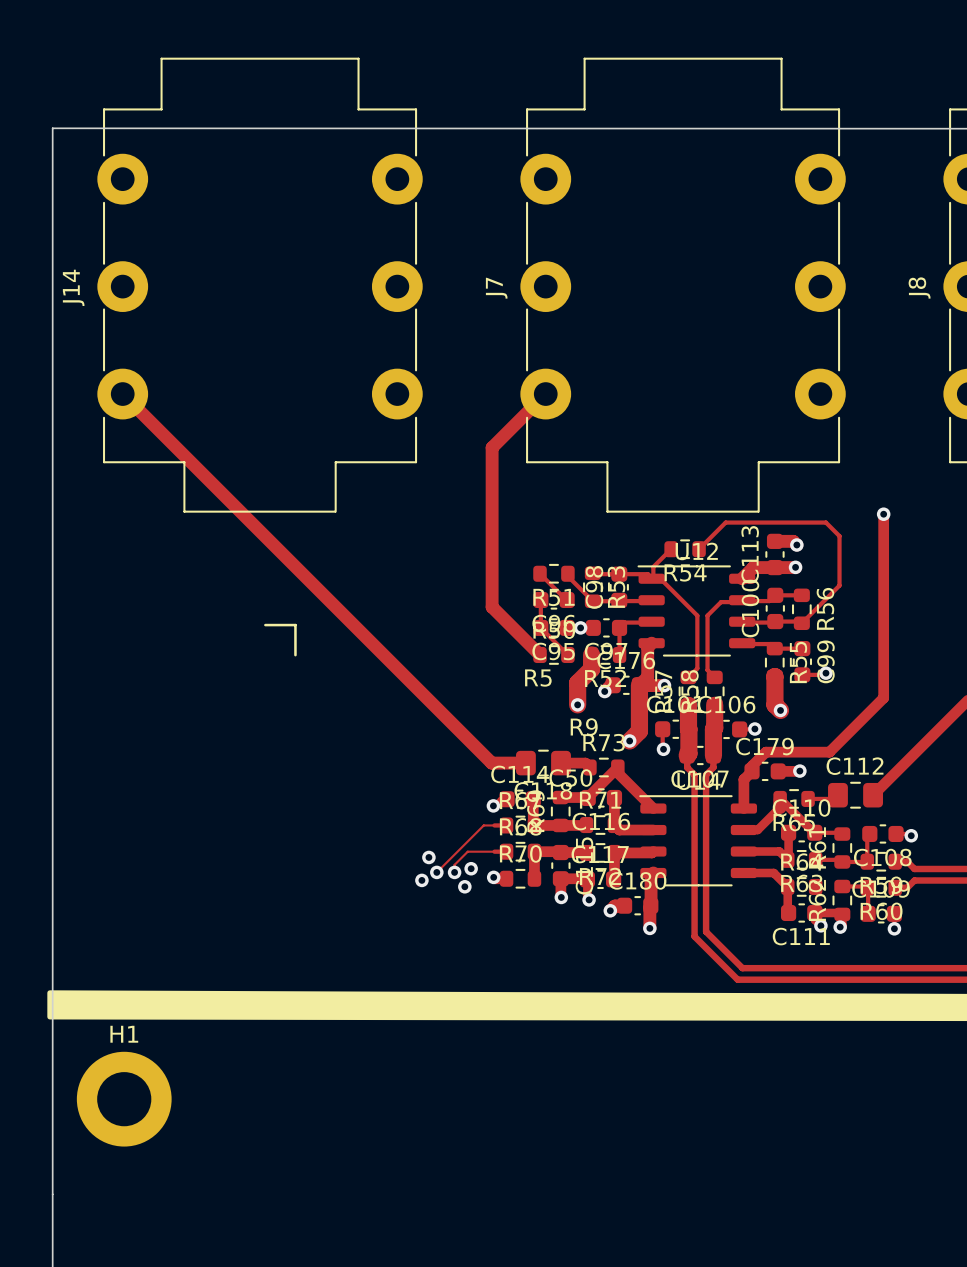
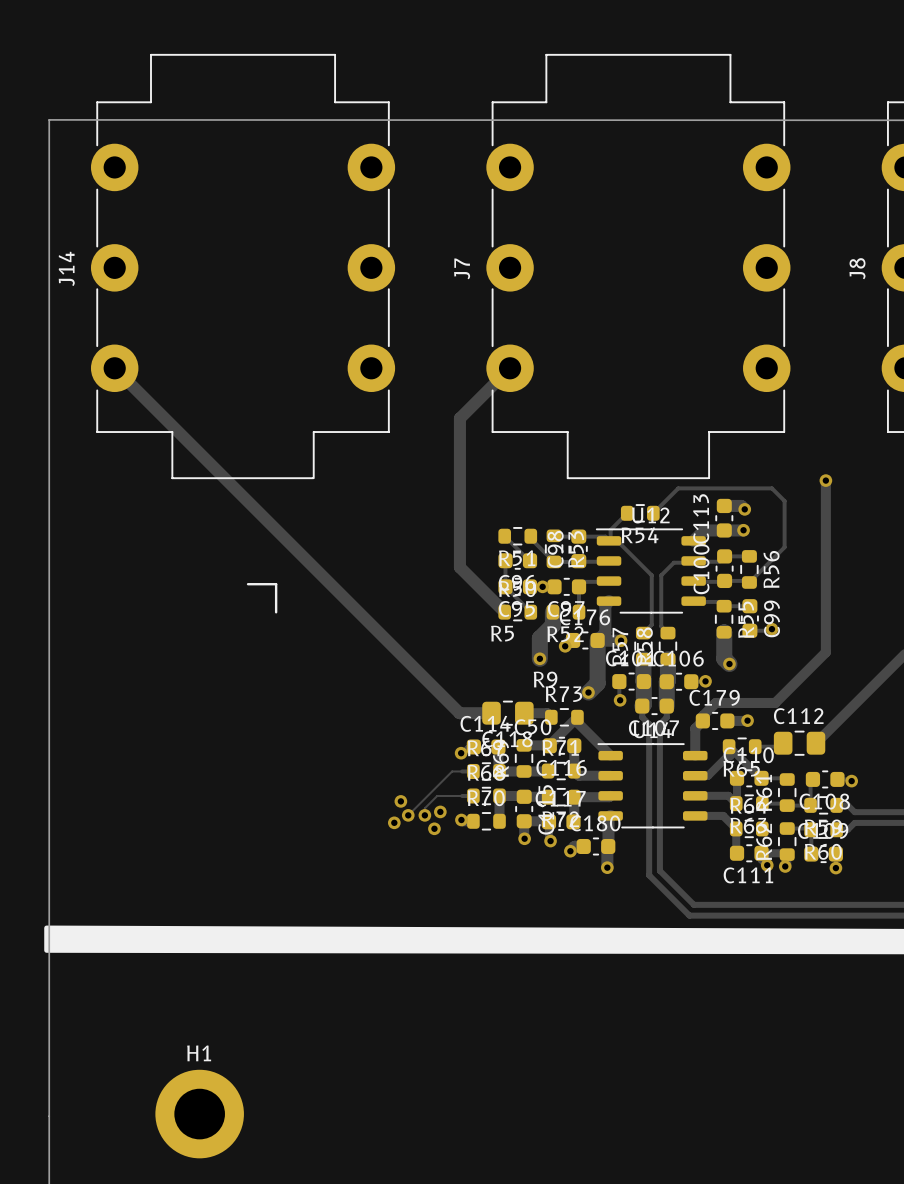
H1 position: (124, 1099) -> (199, 1114)

